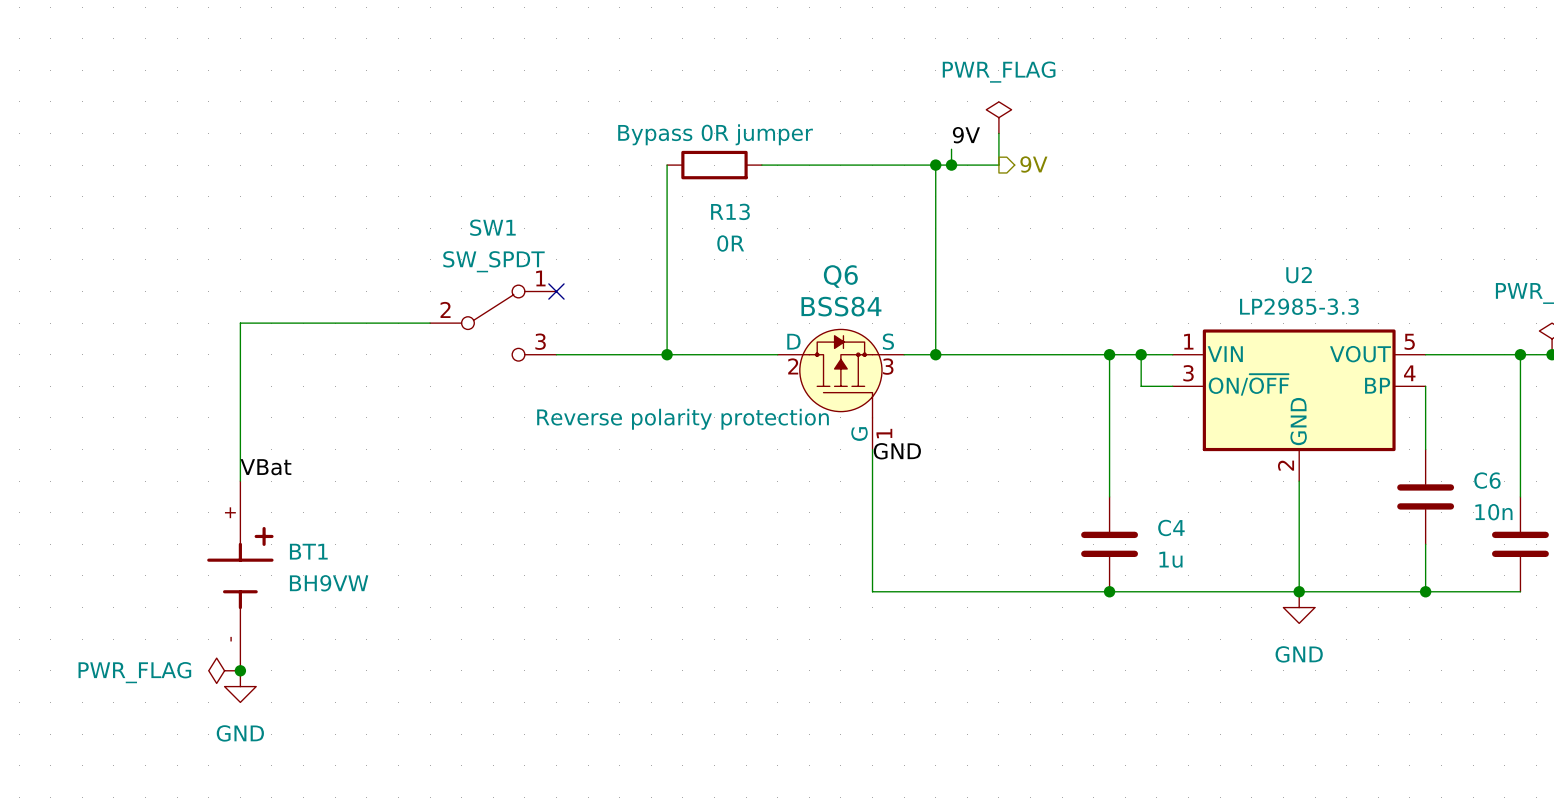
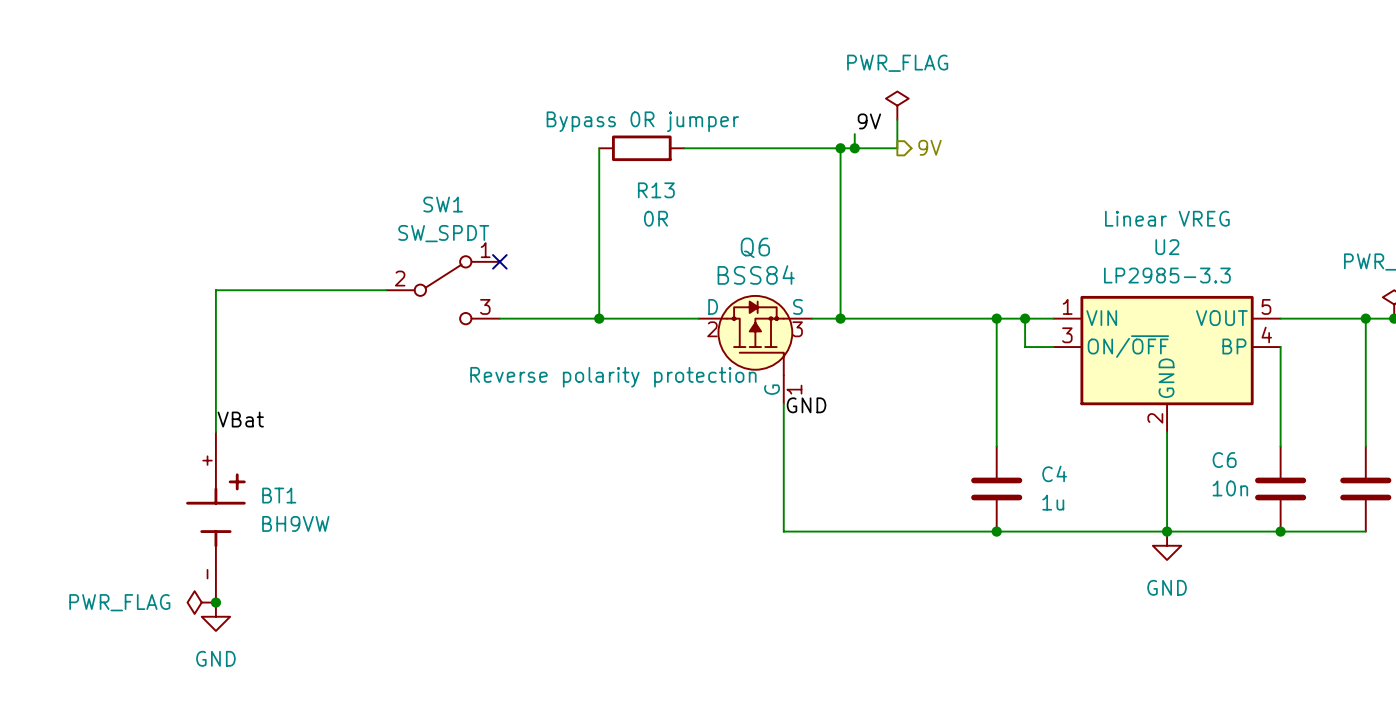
U2 text: none -> Linear VREG (1167, 218)
C6 name position: C6 (1487, 480) -> C6 (1224, 460)
C6 position: (1425, 496) -> (1280, 488)
C6 value position: 10n (1493, 512) -> 10n (1230, 488)

